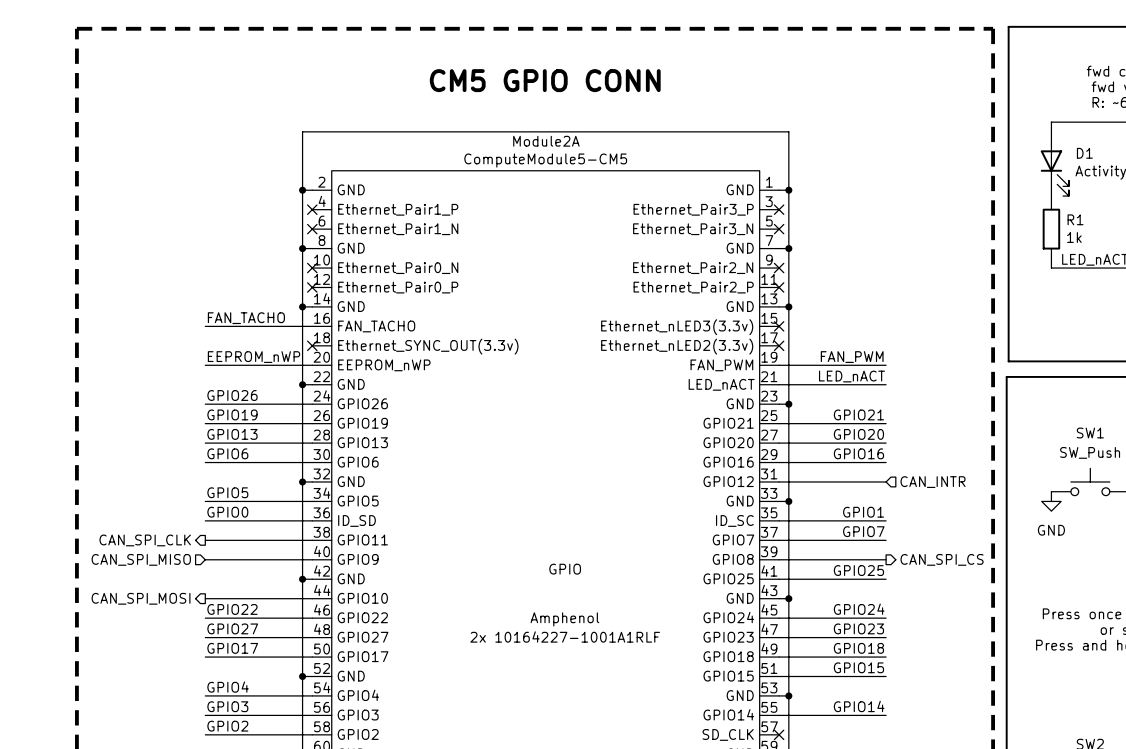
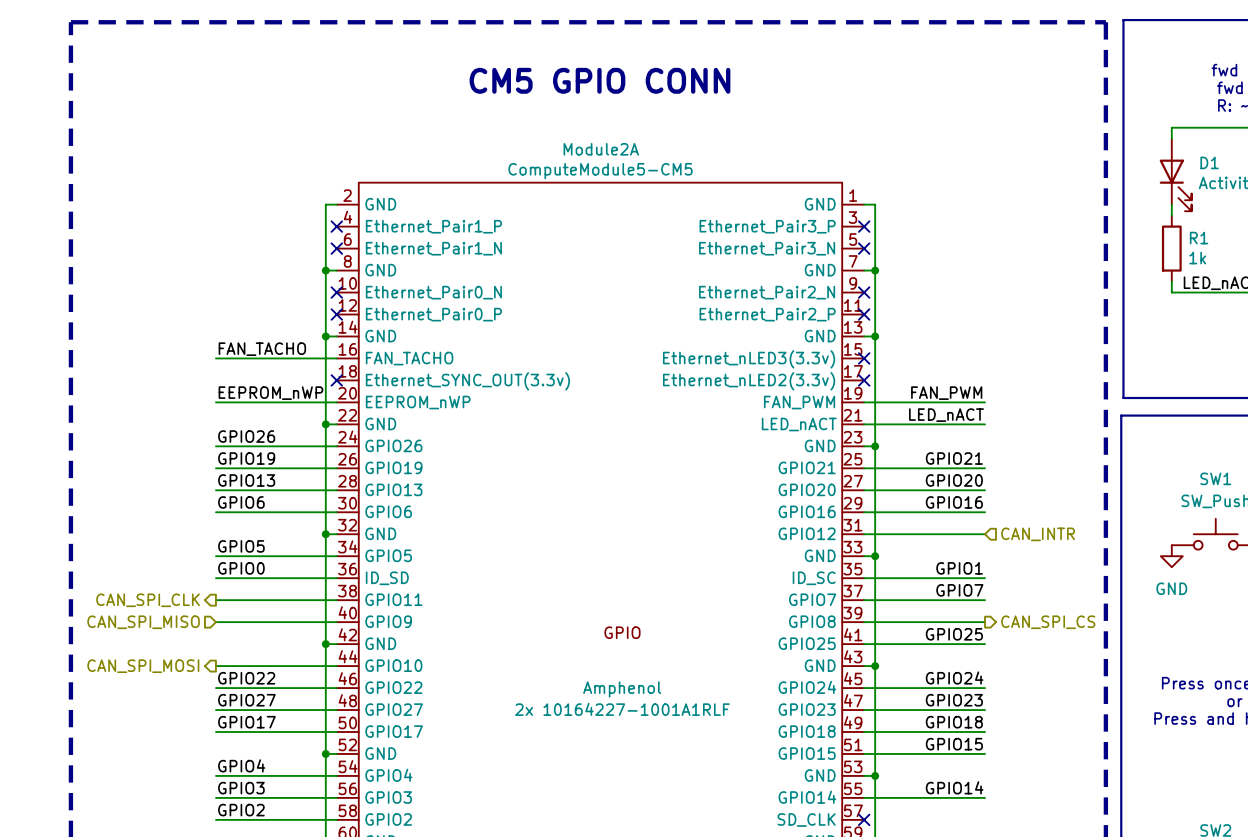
wire: (302, 190) (302, 131) (788, 131) (788, 190) -> none
junction: (302, 190) -> none
junction: (788, 190) -> none

